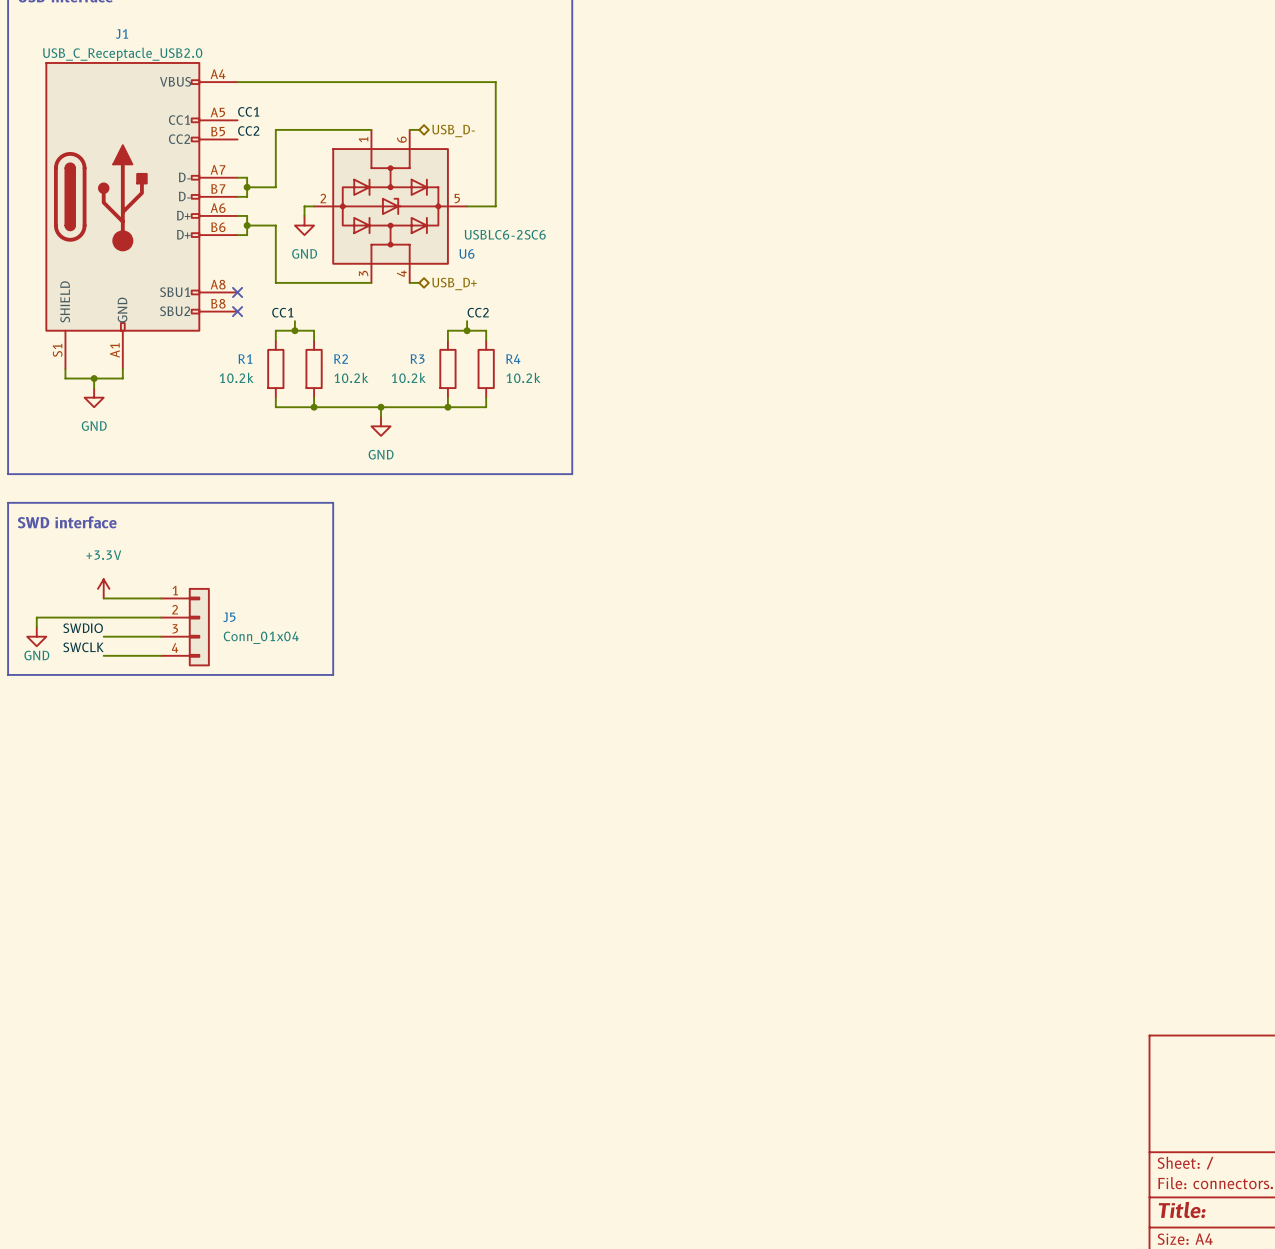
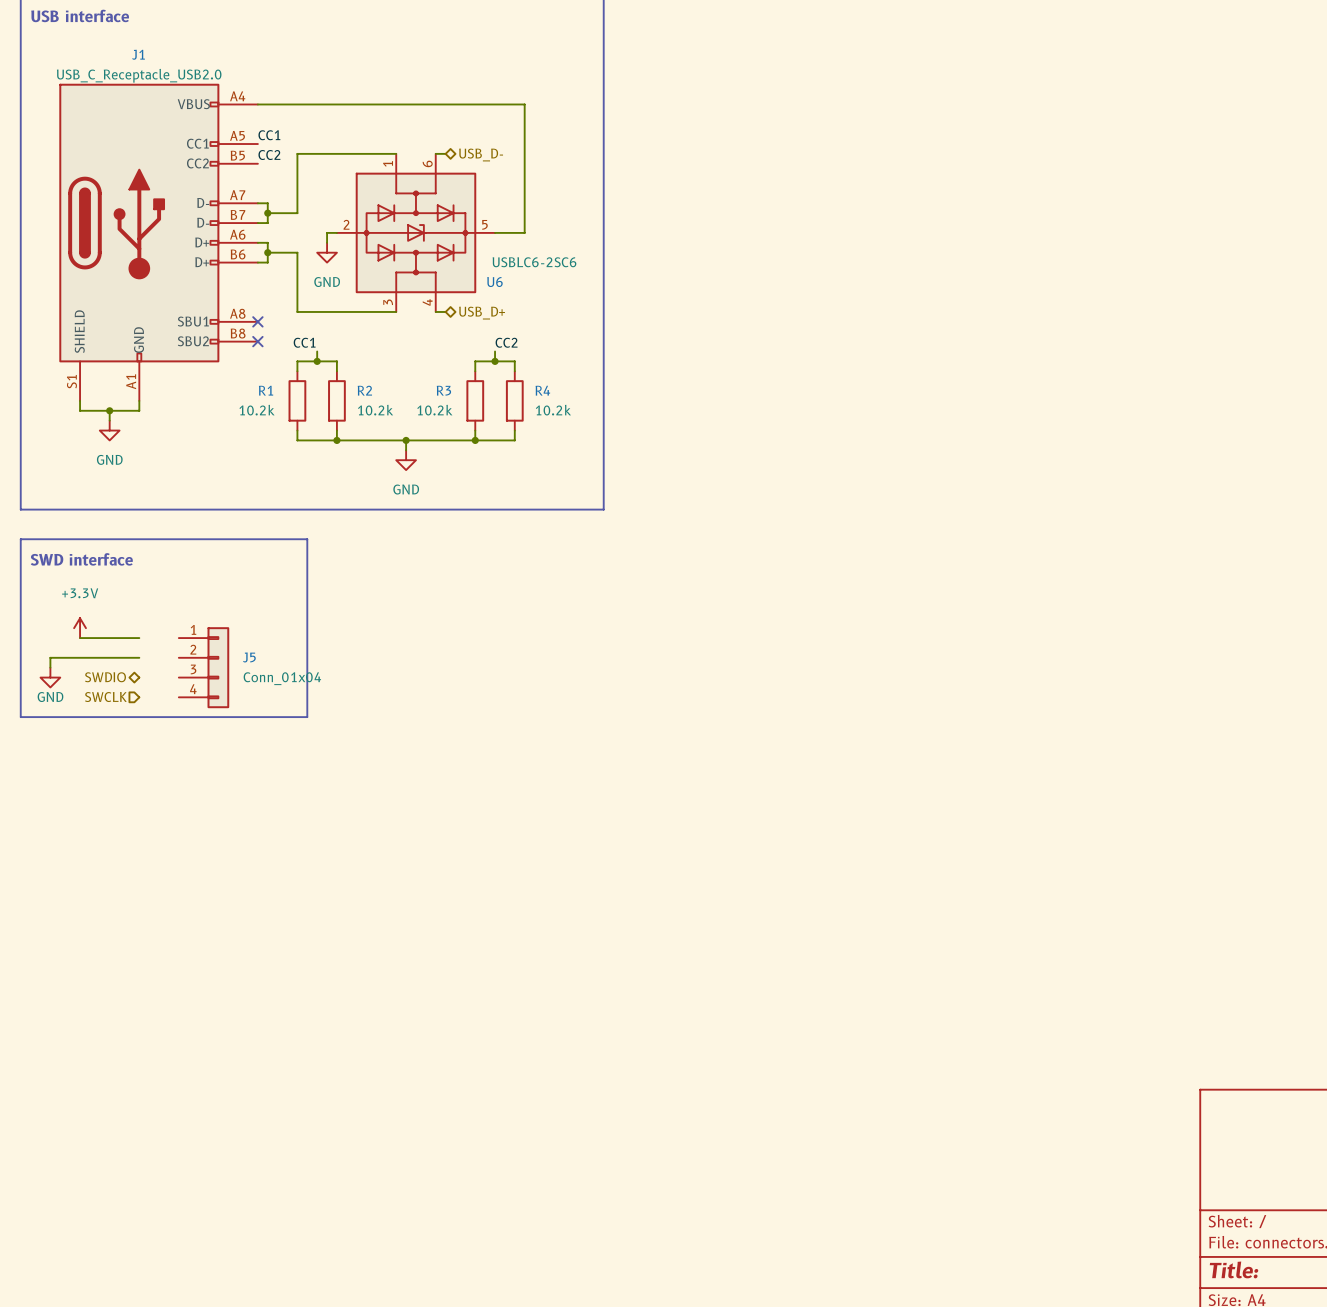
line: (285, 502) (333, 502) (333, 674) (285, 674) -> (307, 539) (307, 717)
power symbol position: +3.3V (103, 588) -> +3.3V (80, 628)
wire: (122, 598) (161, 598) -> (80, 638) (119, 638)
wire: (122, 617) (161, 617) -> none
label: SWDIO (83, 628) -> none
hierarchical label: none -> SWDIO (105, 677)
wire: (103, 636) (161, 636) -> none
label: SWCLK (83, 647) -> none
hierarchical label: none -> SWCLK (105, 697)
wire: (103, 655) (161, 655) -> none

